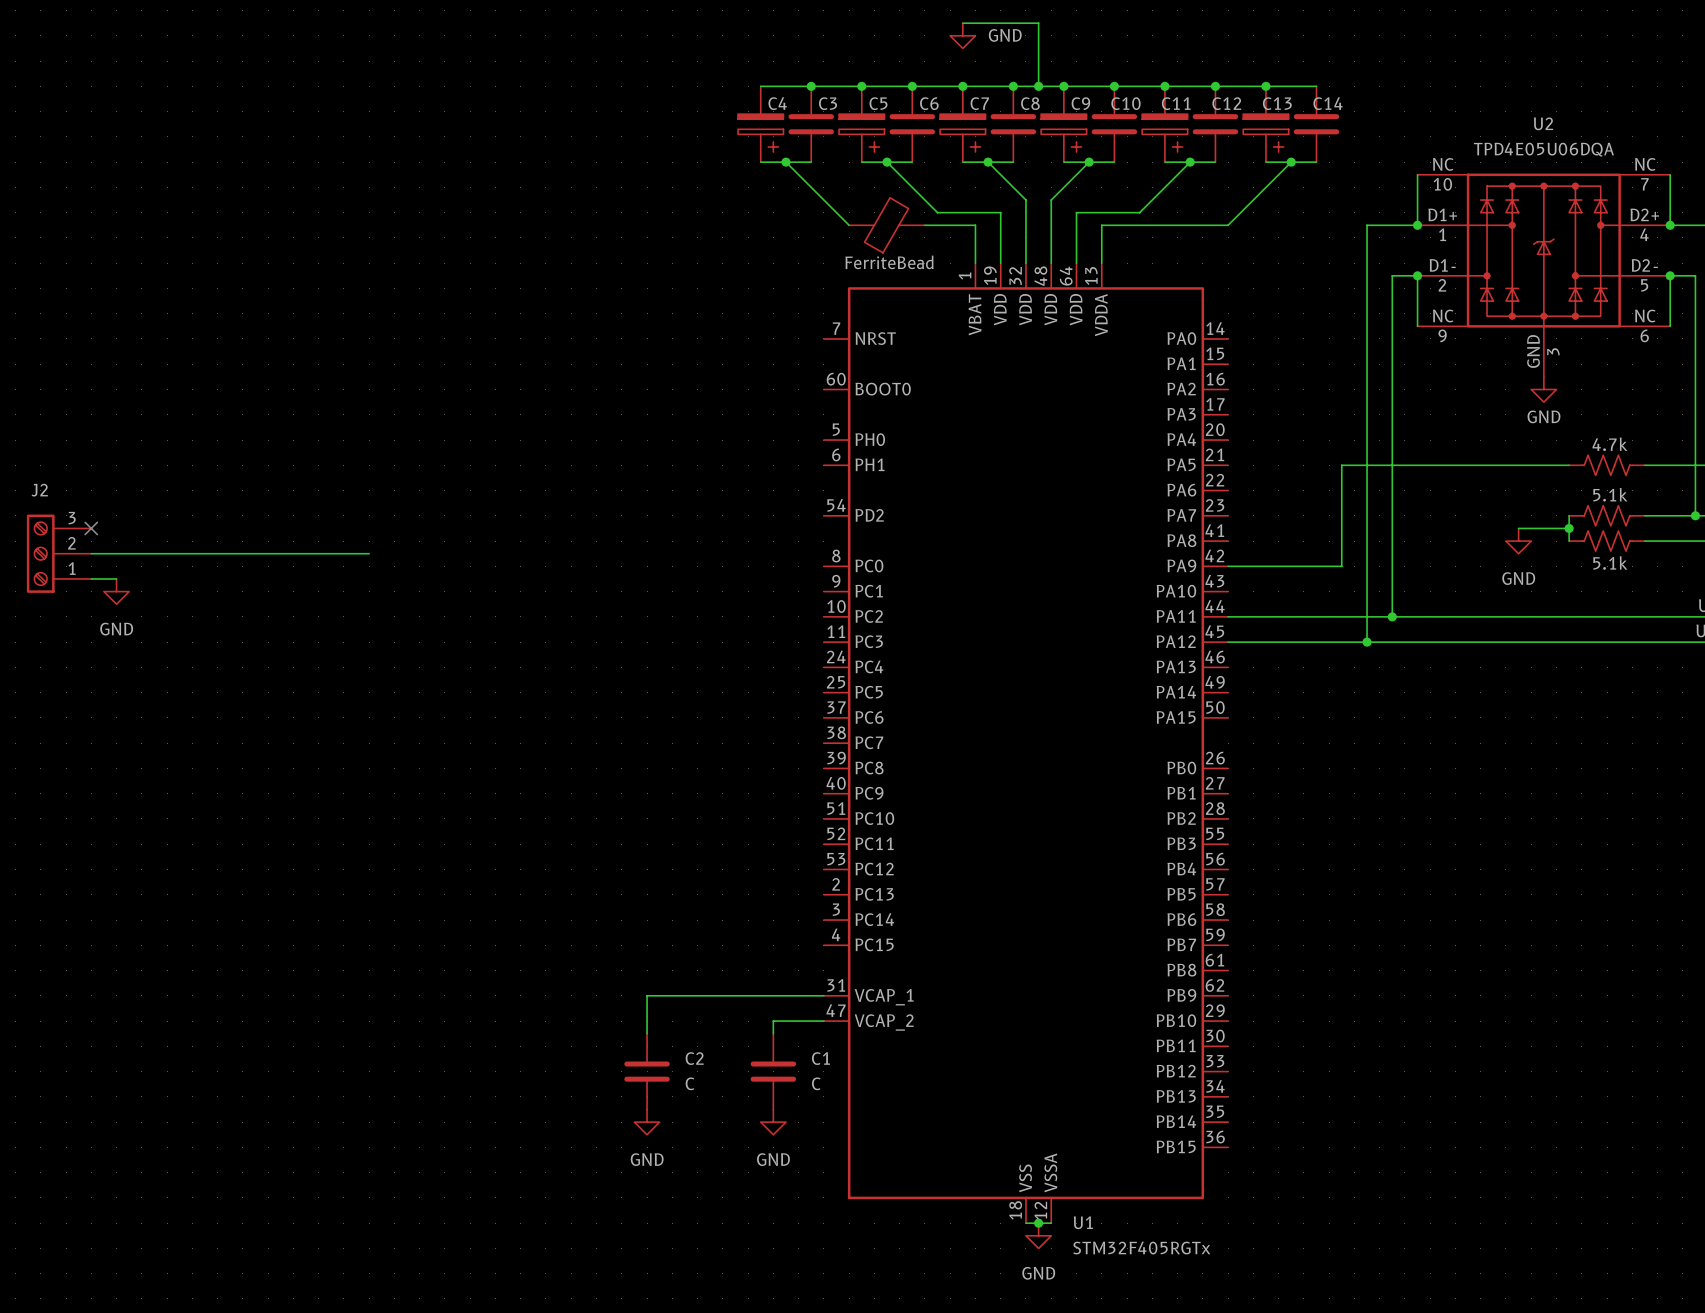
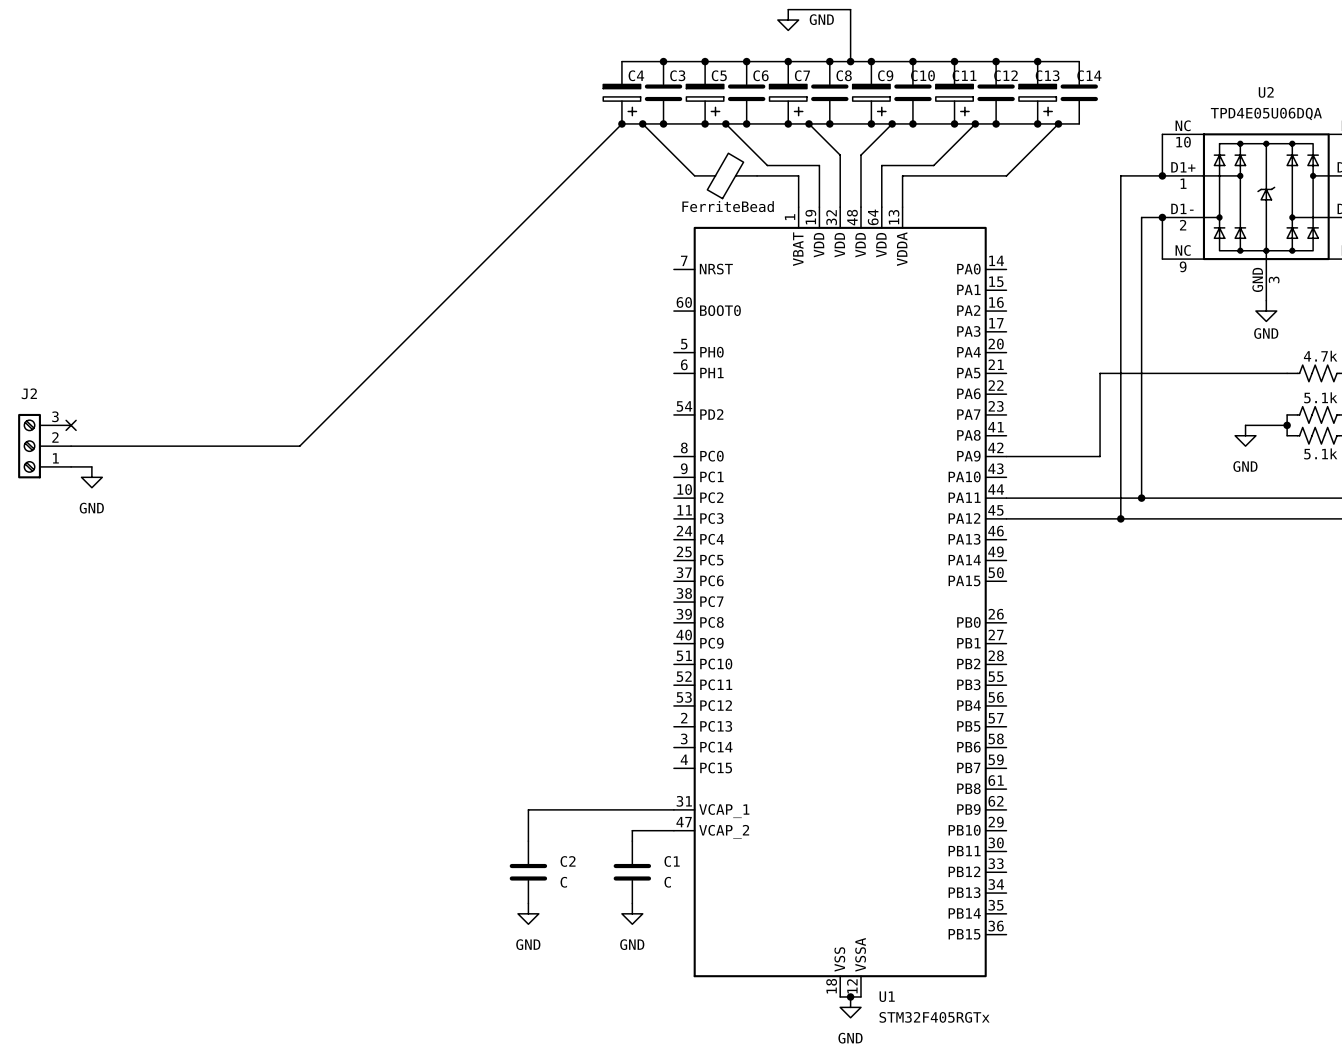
wire: none -> (621, 123) (299, 446)
junction: none -> (621, 123)
wire: none -> (663, 123) (705, 123)
junction: none -> (663, 123)
junction: none -> (705, 123)
wire: none -> (746, 123) (788, 123)
junction: none -> (746, 123)
junction: none -> (788, 123)
wire: none -> (829, 123) (871, 123)
junction: none -> (829, 123)
junction: none -> (871, 123)
wire: none -> (912, 123) (954, 123)
junction: none -> (912, 123)
junction: none -> (954, 123)
wire: none -> (996, 123) (1037, 123)
junction: none -> (996, 123)
junction: none -> (1037, 123)

